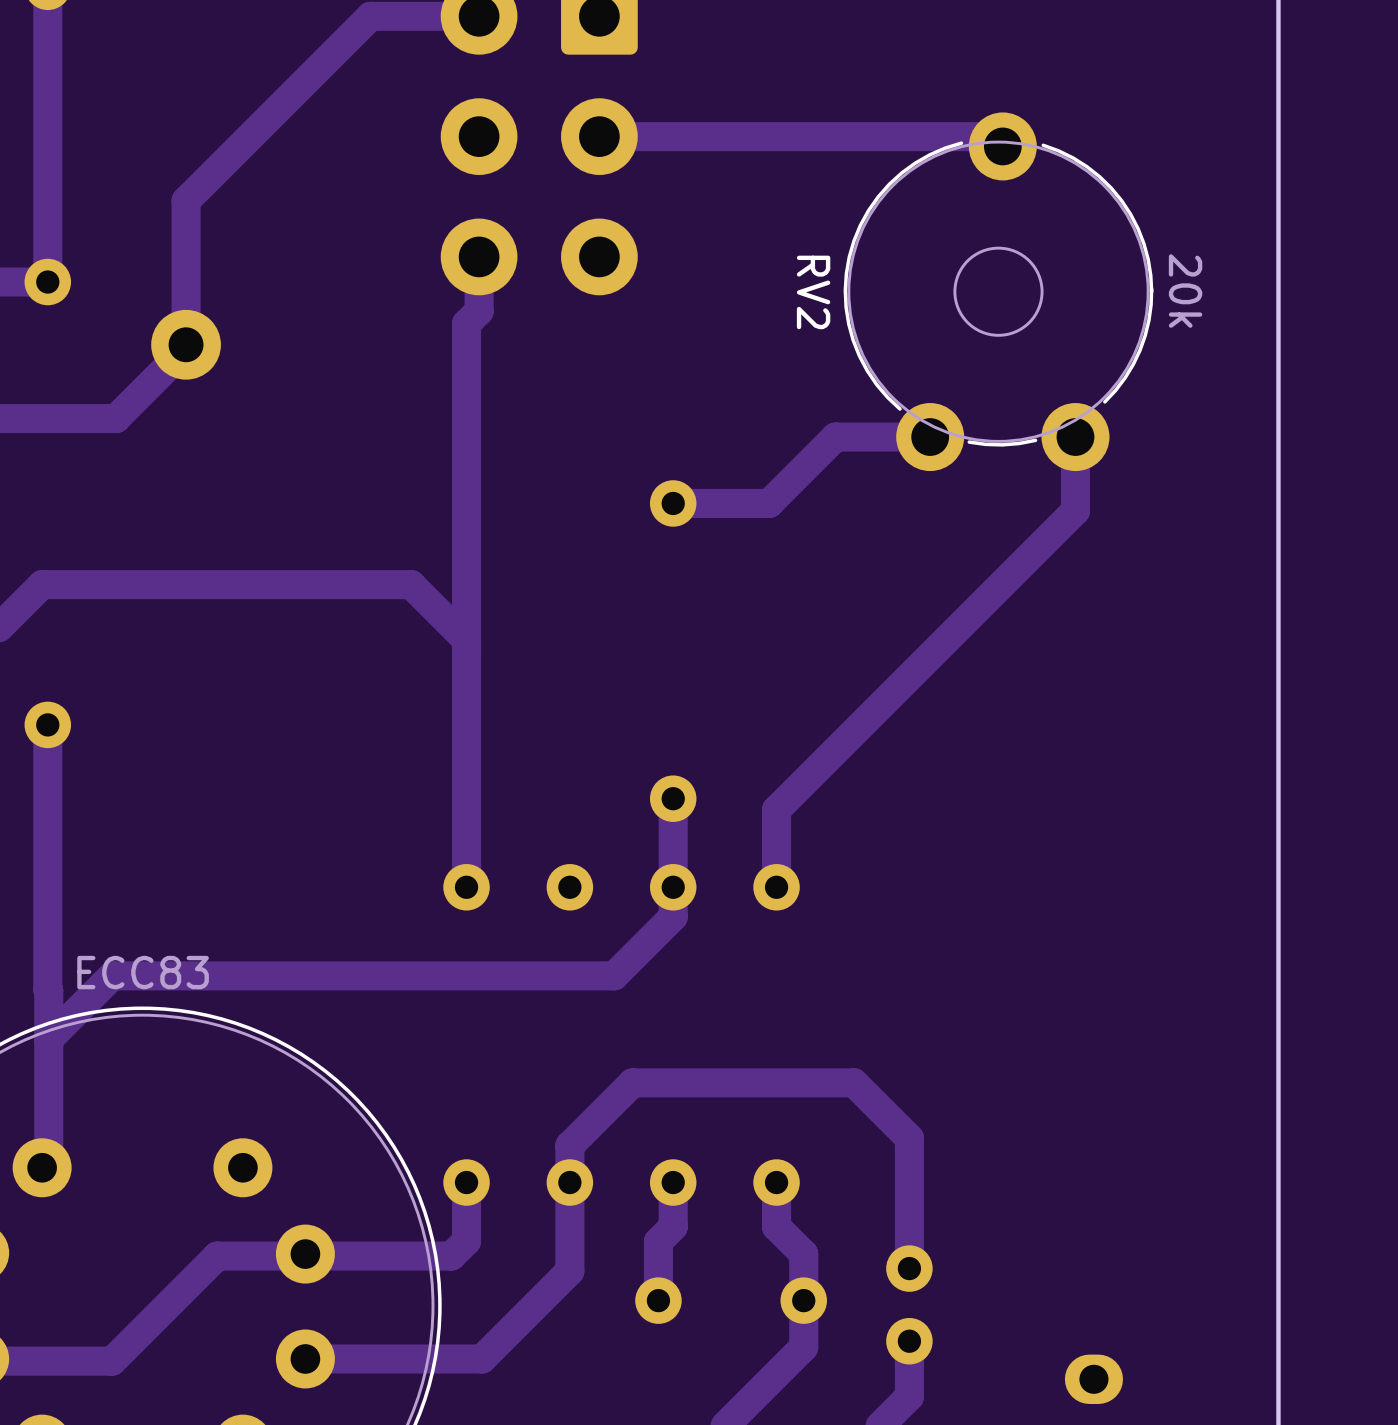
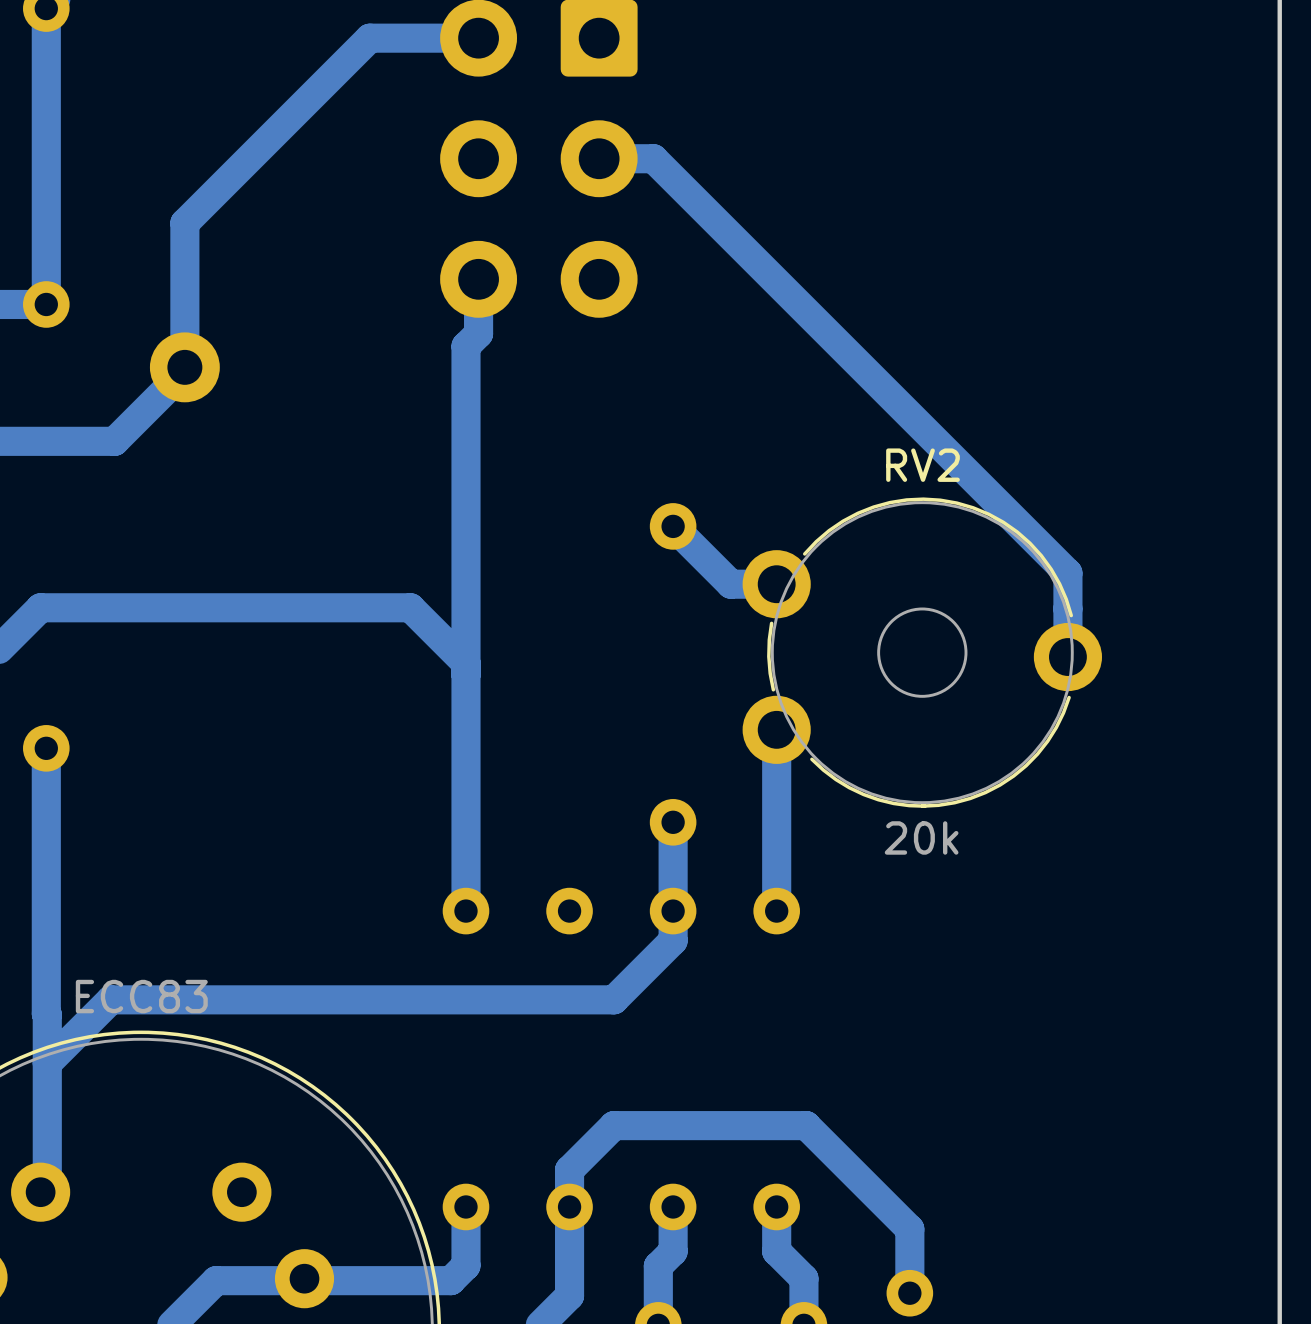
track: (653, 136) (993, 136) (1002, 146) -> (653, 158) (1067, 573) (1067, 657)
RV2 rotation: 0° (998, 291) -> 90° clockwise (922, 652)
RV2 position: (998, 291) -> (922, 652)
track: (930, 437) (835, 437) (769, 503) (673, 503) -> (776, 584) (730, 584) (673, 526)
track: (1075, 437) (1075, 510) (776, 809) -> (776, 729) (776, 833)
track: (614, 1101) (632, 1082) (854, 1082) (909, 1138) (909, 1204) -> (613, 1125) (806, 1125) (909, 1229)

